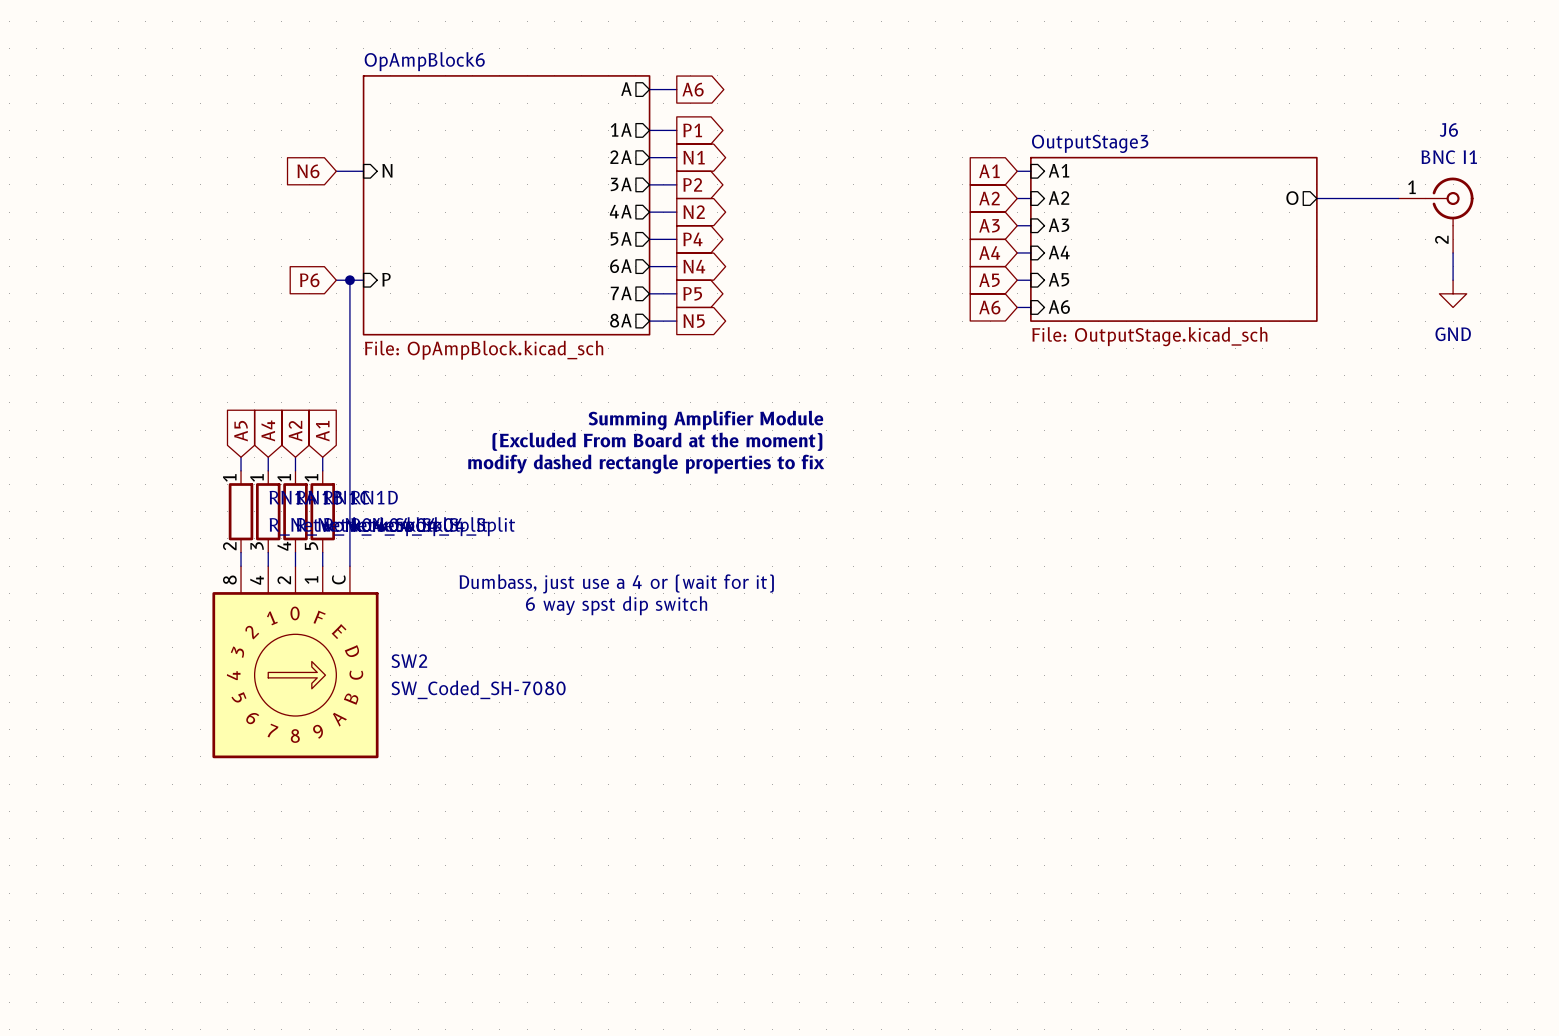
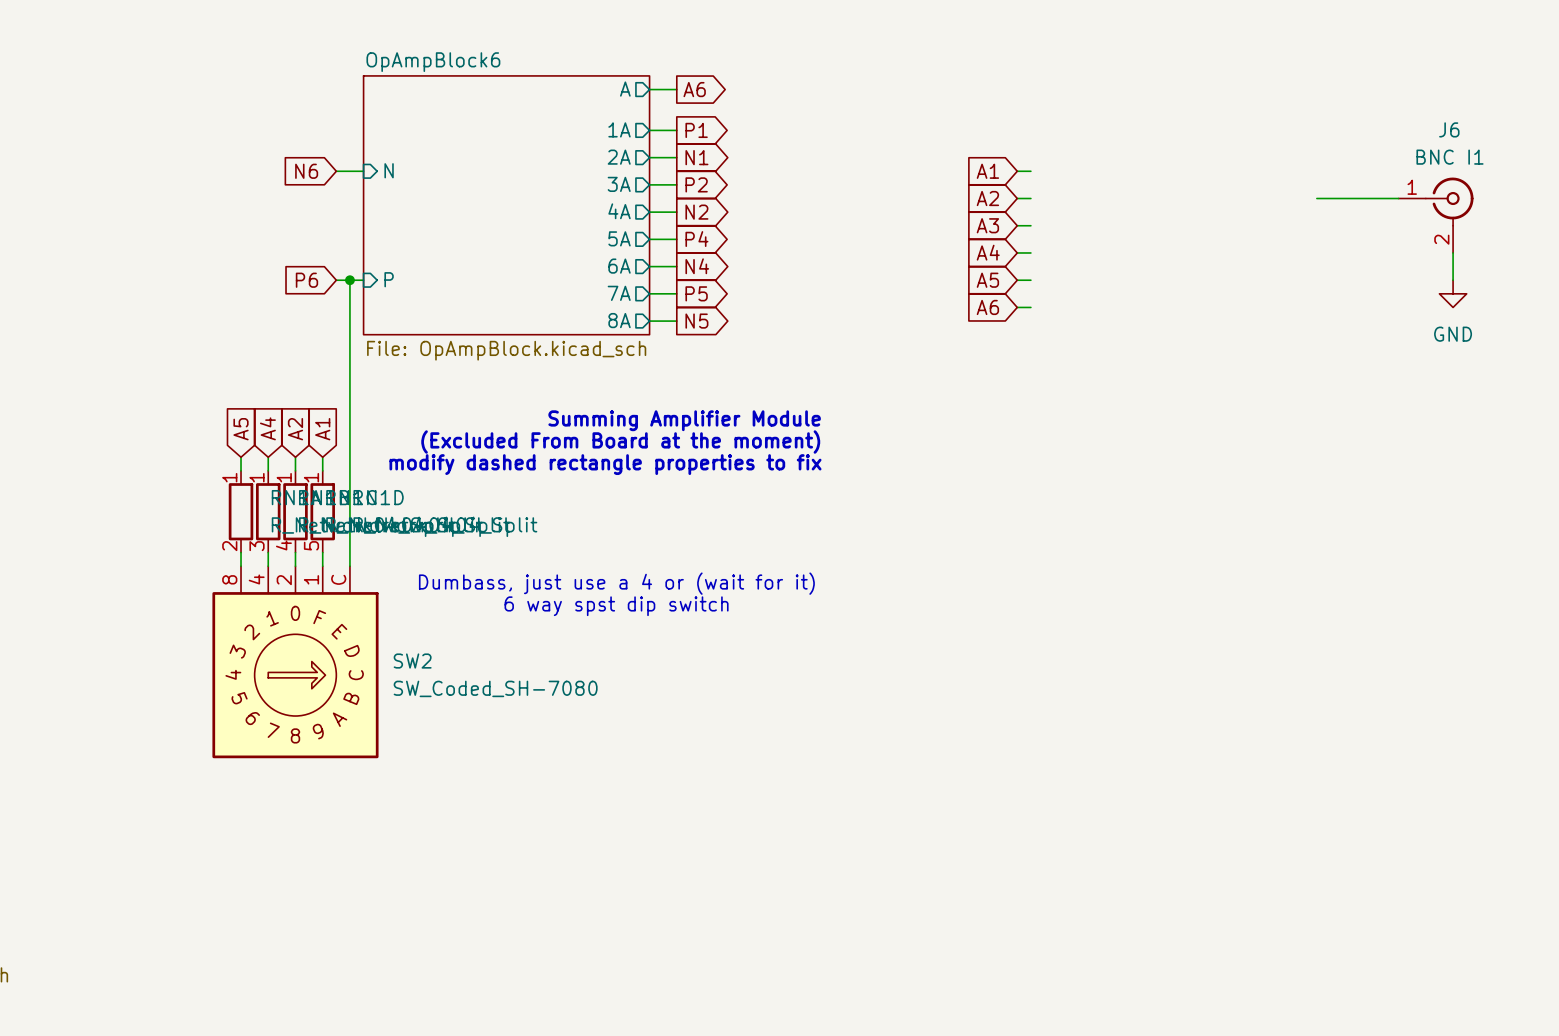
sheet pin: A1 (1058, 170) -> none
sheet pin: A2 (1059, 198) -> none
sheet pin: O (1292, 198) -> none
sheet pin: A3 (1059, 225) -> none
sheet OutputStage3: File: OutputStage.kicad_sch (1173, 239) -> none
sheet pin: A4 (1059, 252) -> none
sheet pin: A5 (1058, 279) -> none
sheet pin: A6 (1059, 307) -> none

